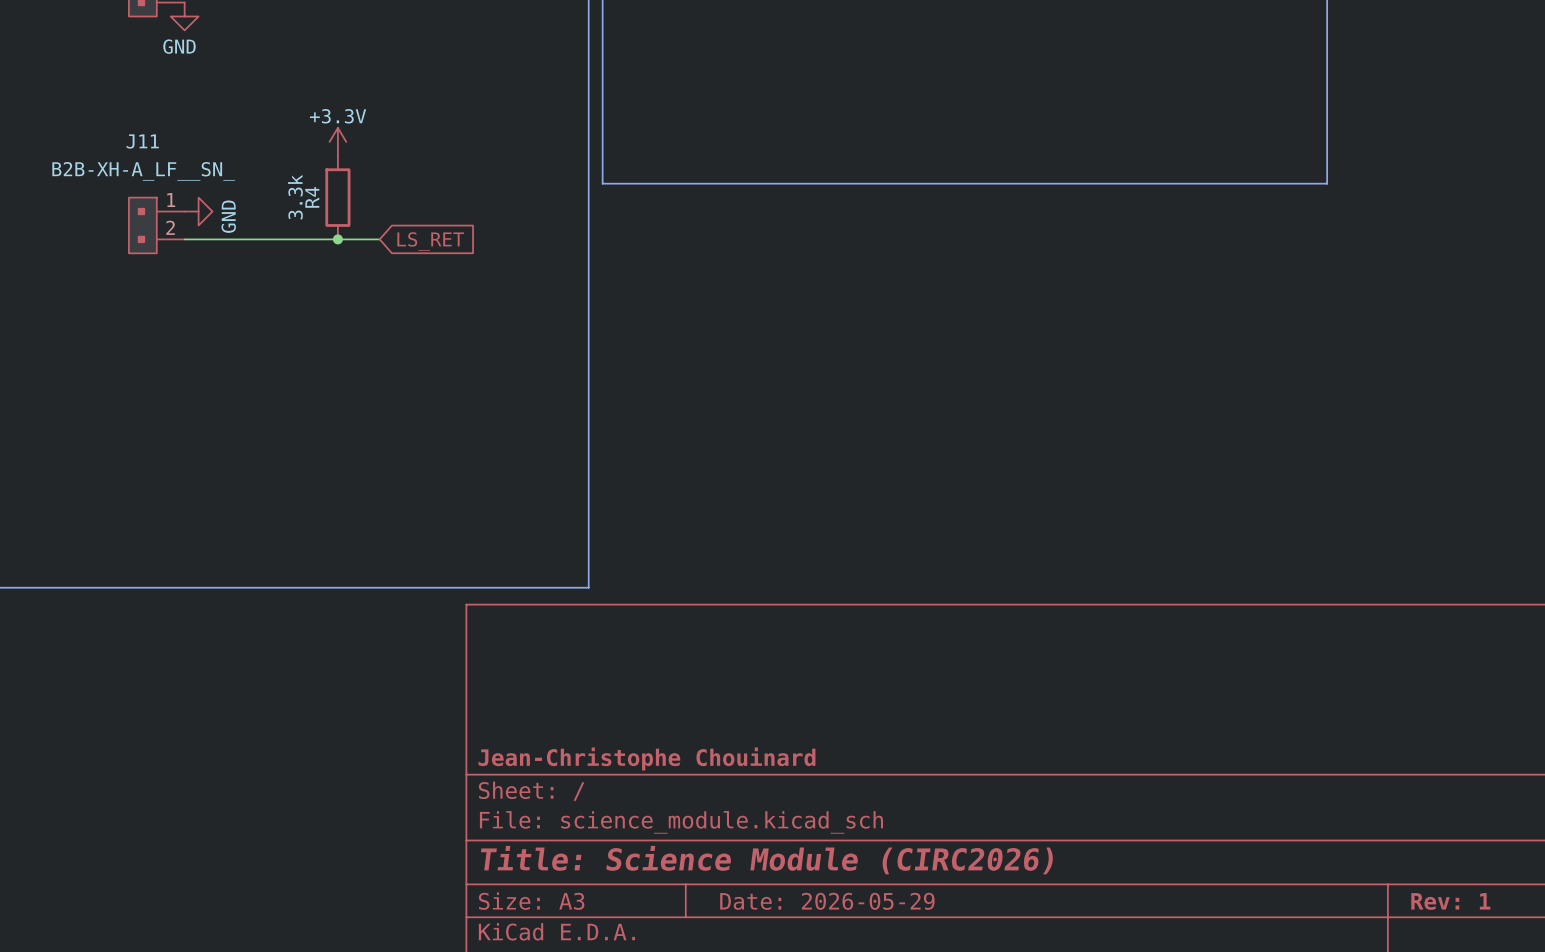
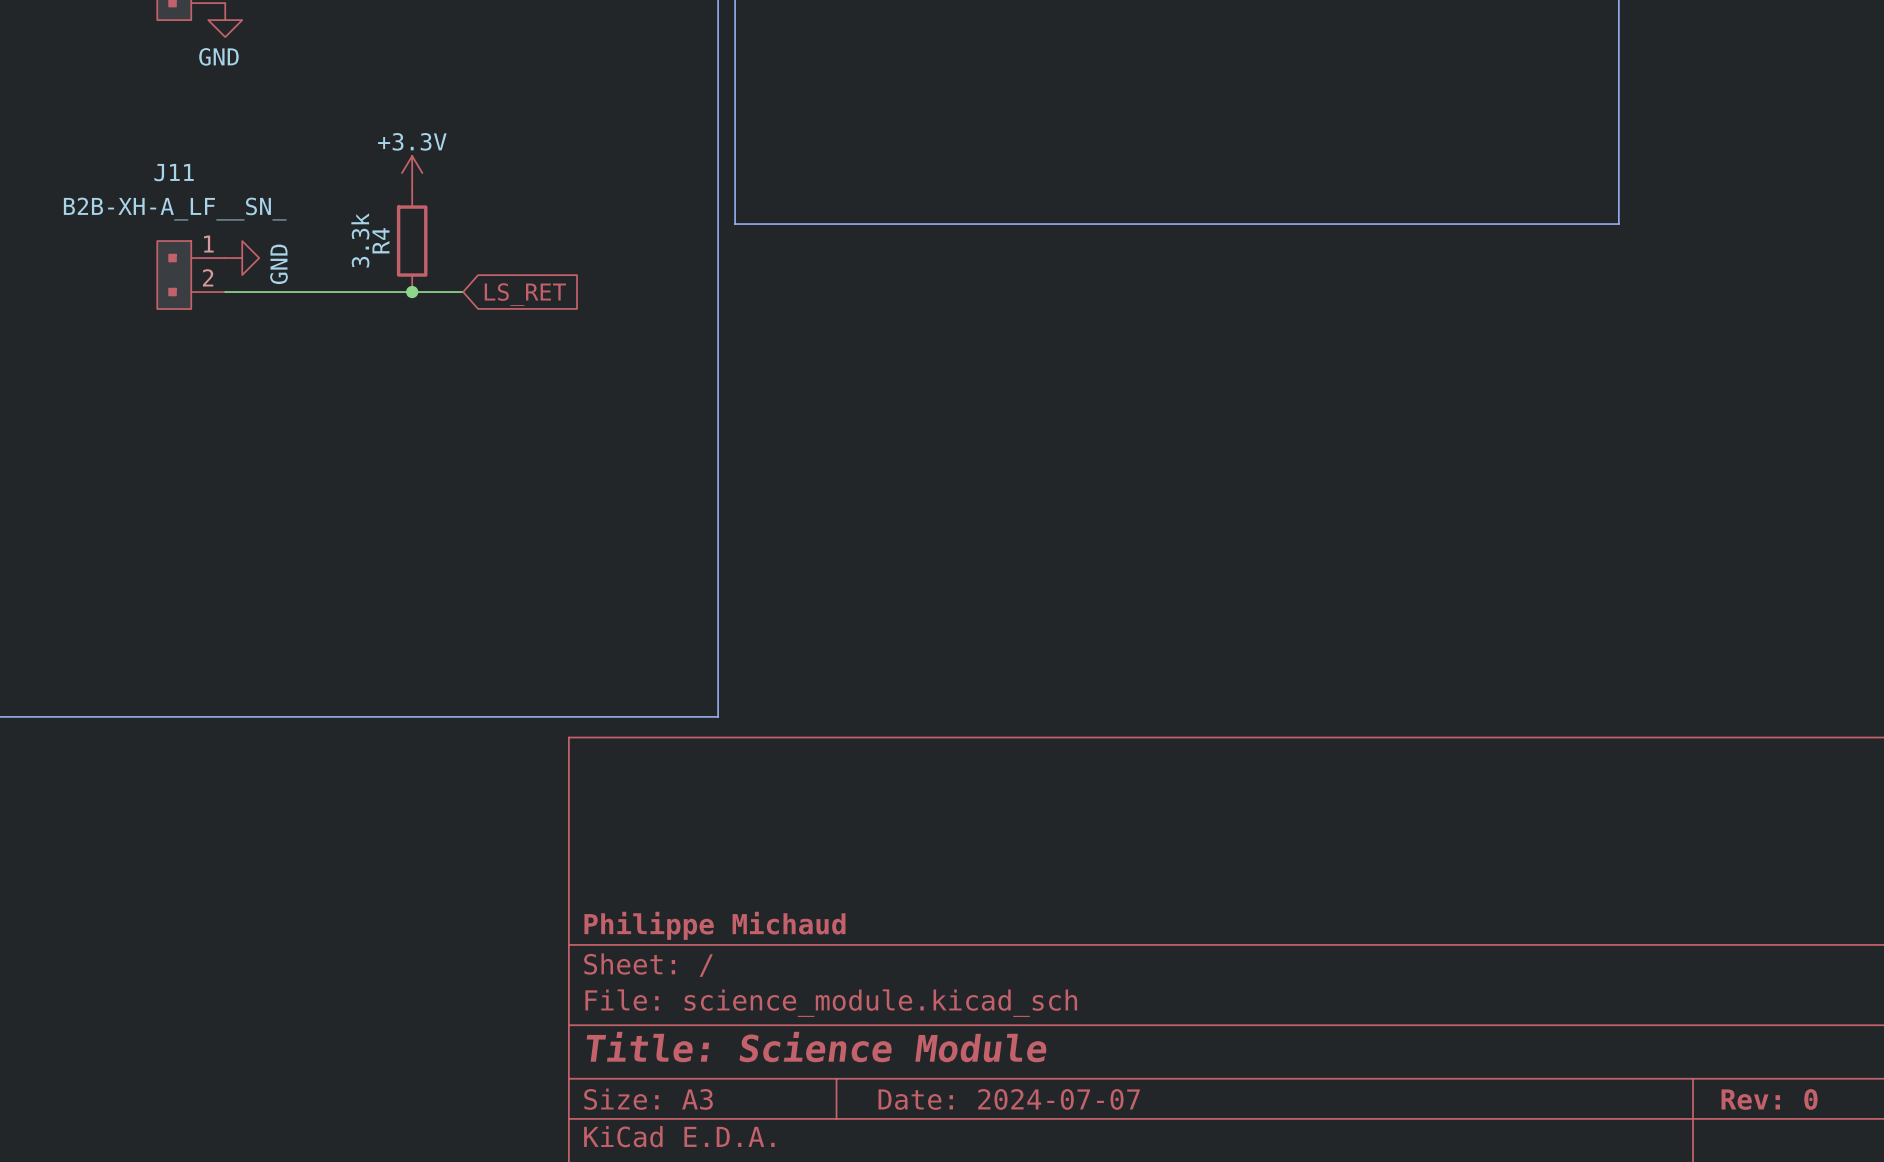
title block: Jean-Christophe Chouinard (646, 758) -> Philippe Michaud (714, 925)
title block: Title: Science Module (CIRC2026) (767, 860) -> Title: Science Module (816, 1047)
title block: Date: 2026-05-29 (827, 901) -> Date: 2024-07-07 (1009, 1099)
title block: Rev: 1 (1450, 901) -> Rev: 0 (1769, 1099)

